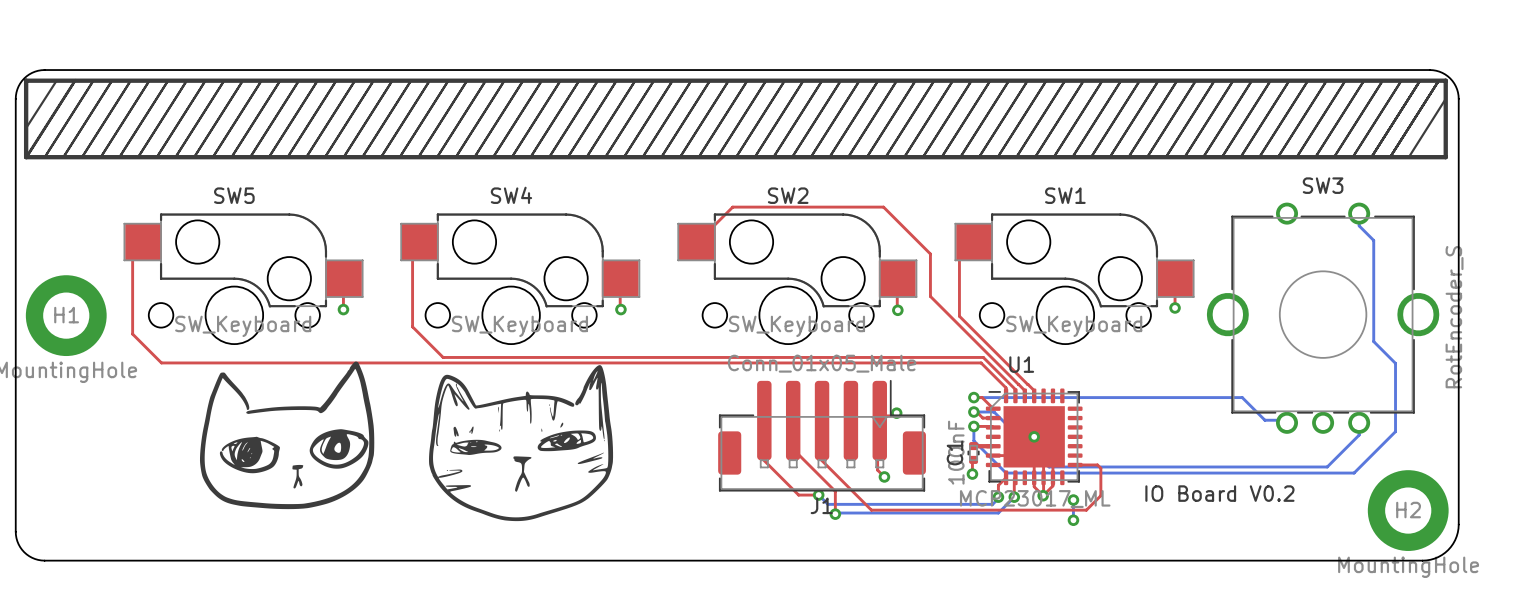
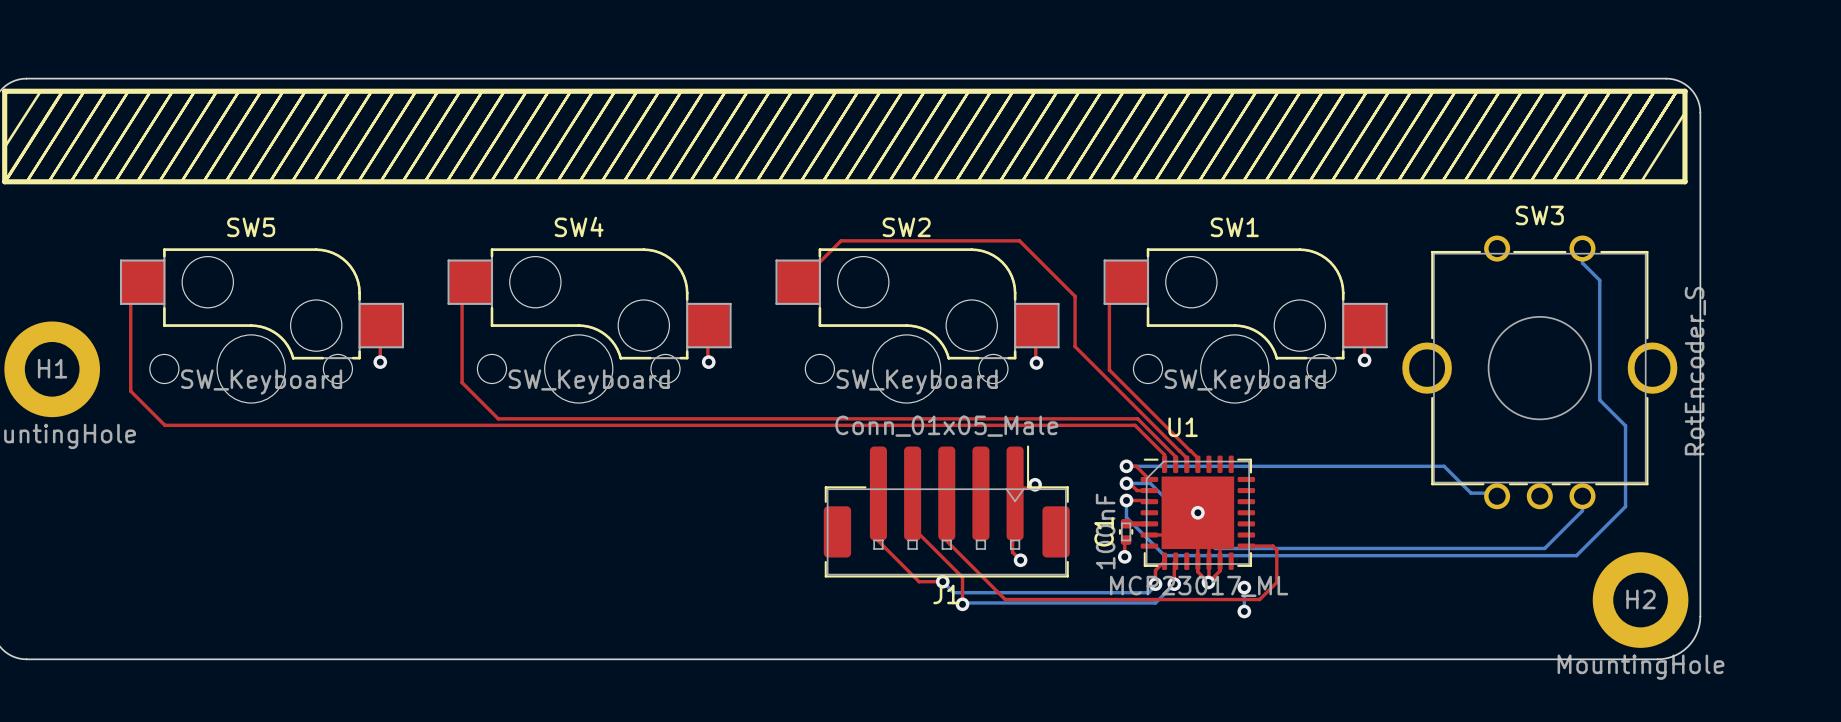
drawing: [199, 361, 375, 510] -> none
drawing: [429, 365, 614, 522] -> none
text: IO Board V0.2 (1219, 493) -> none

